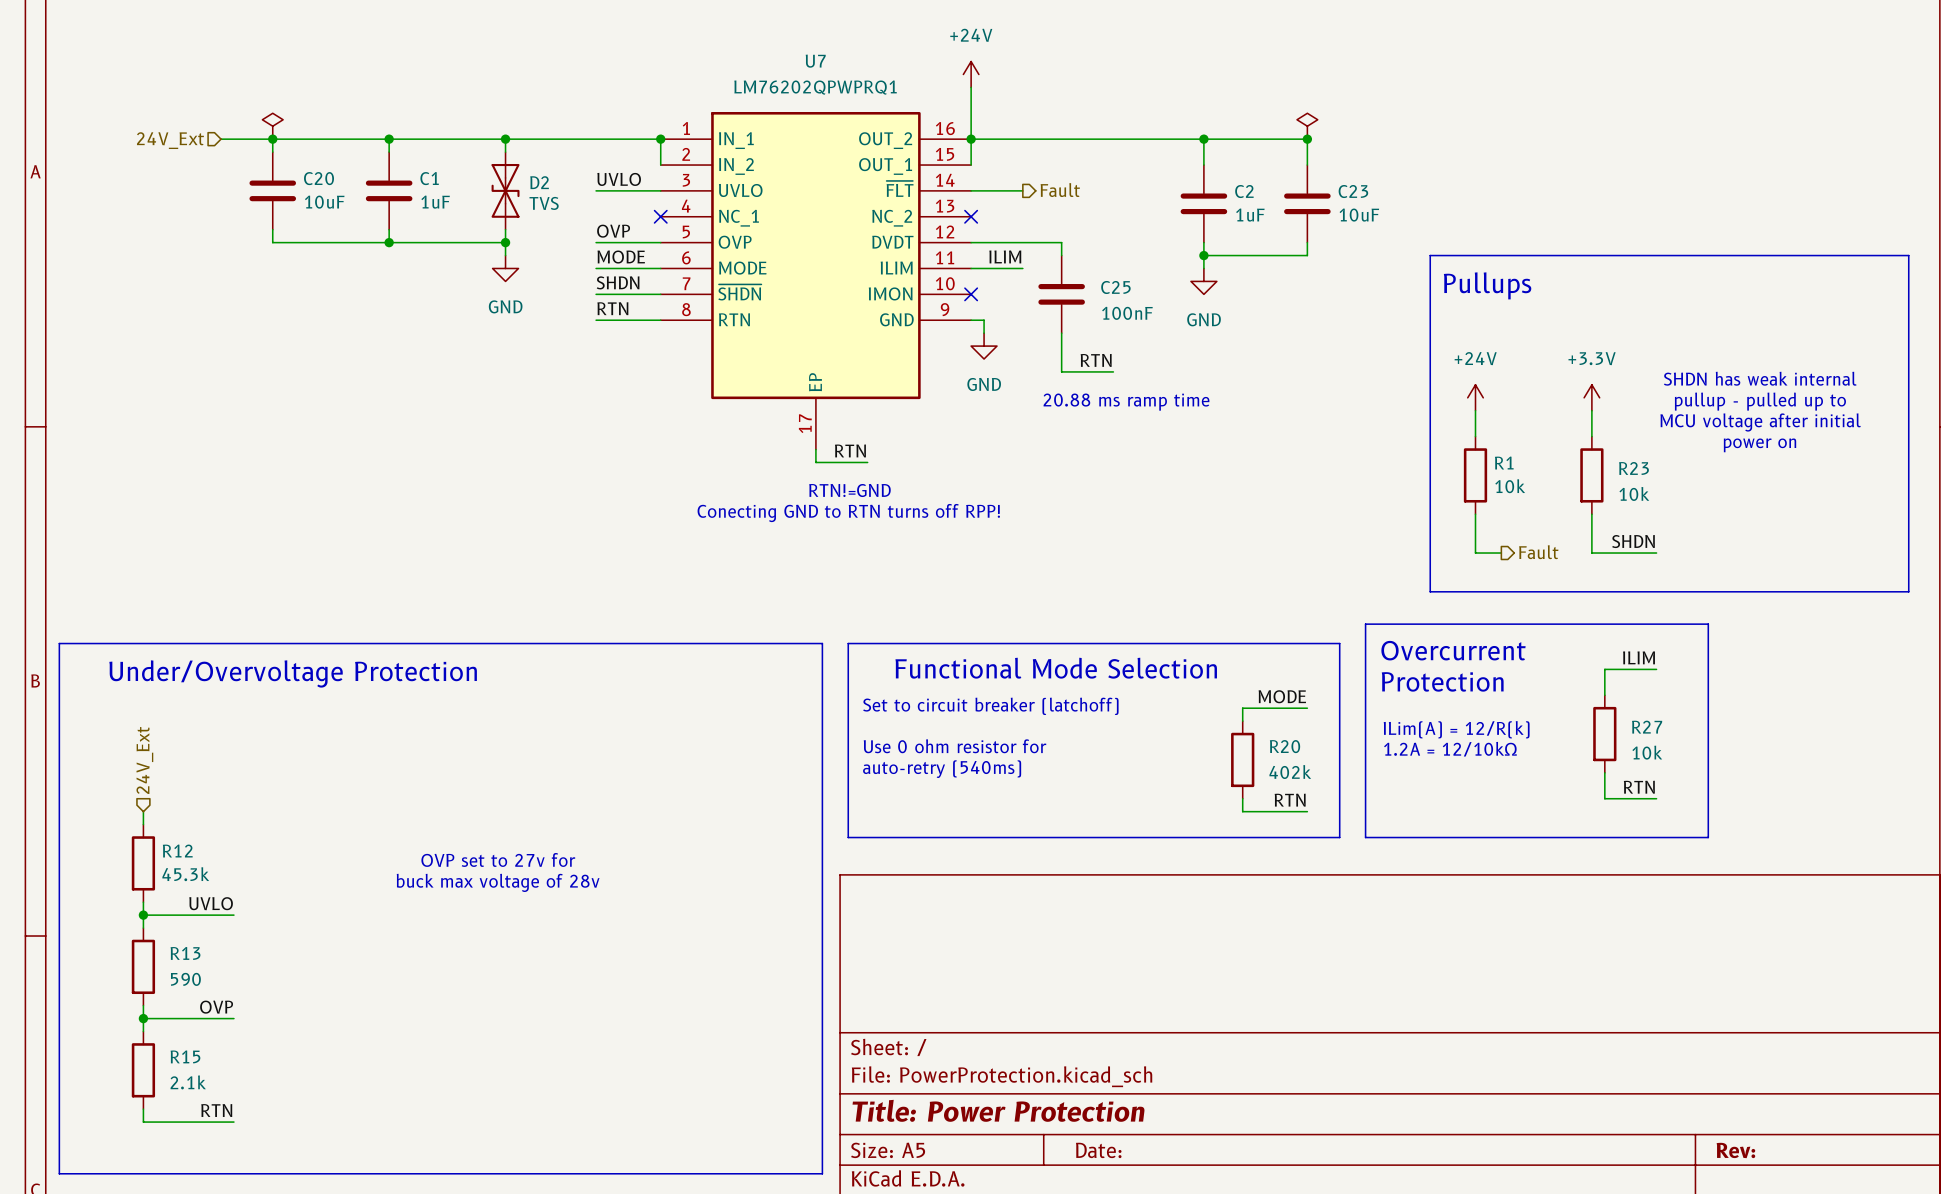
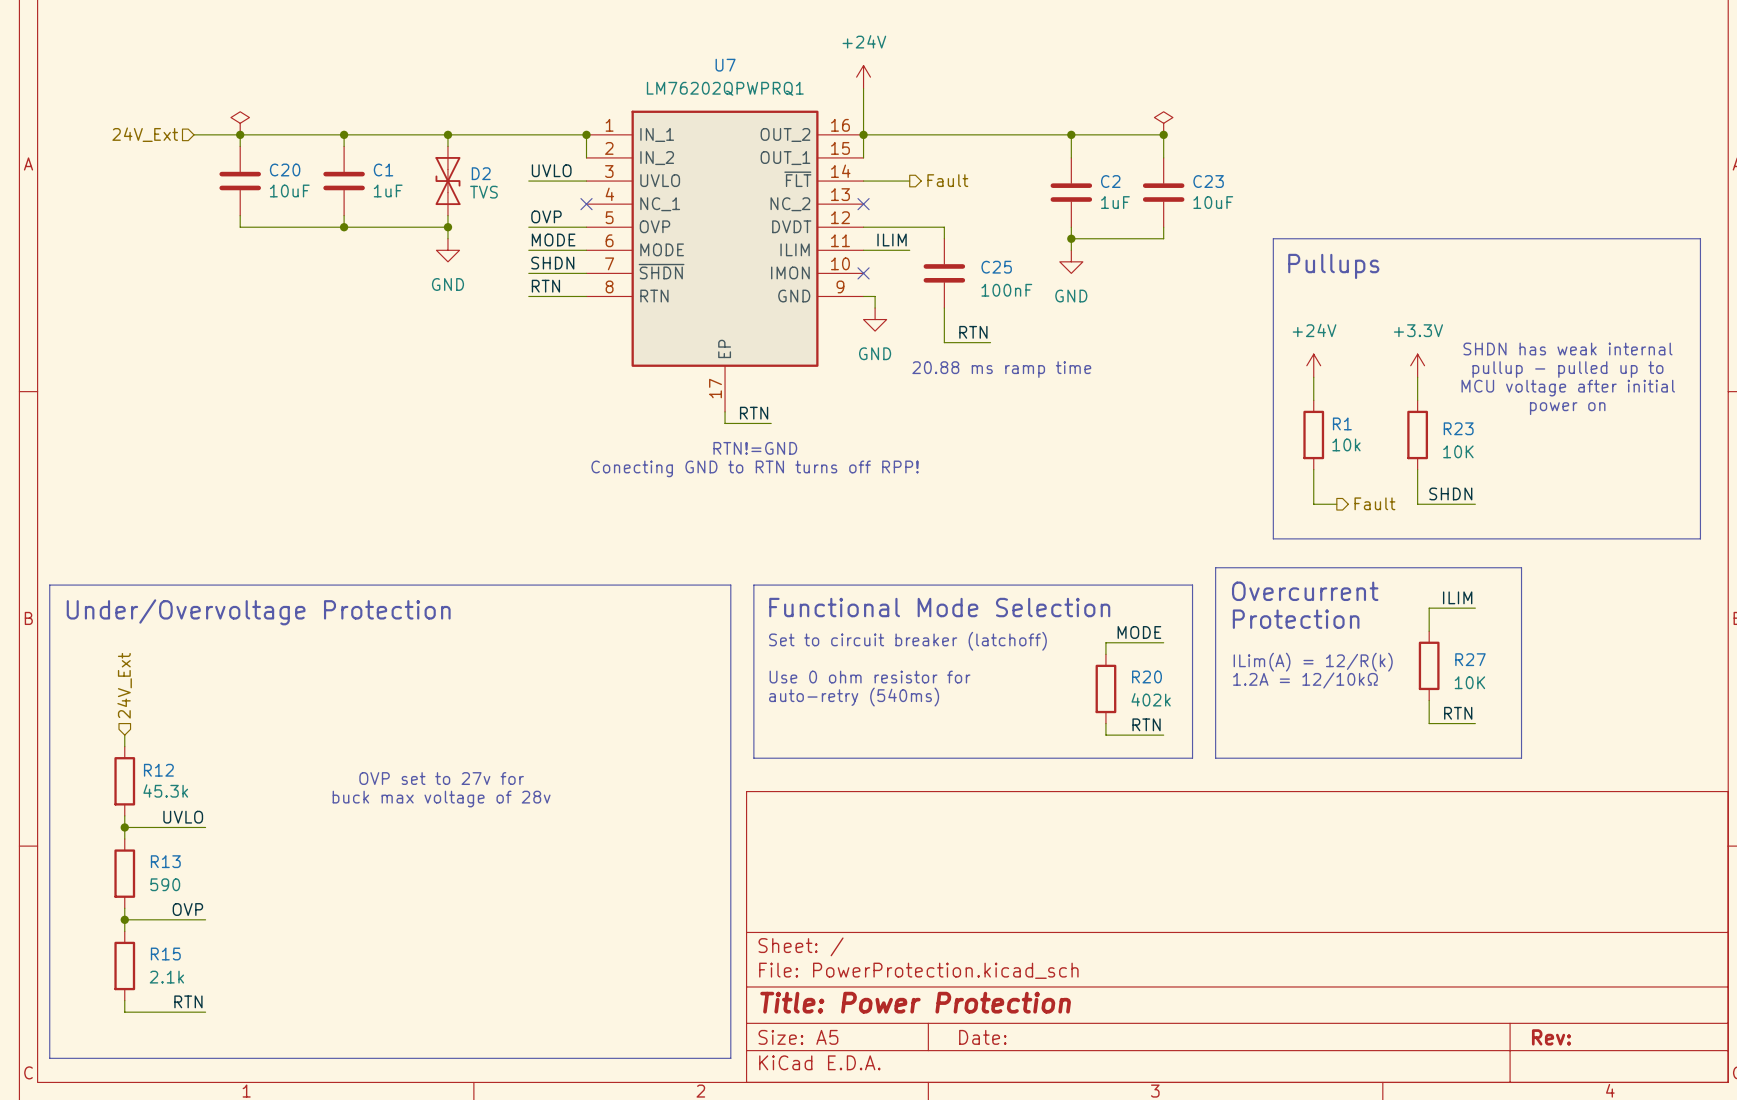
R23 value: 10k (1634, 493) -> 10K (1458, 451)
R27 value: 10k (1647, 752) -> 10K (1469, 682)

